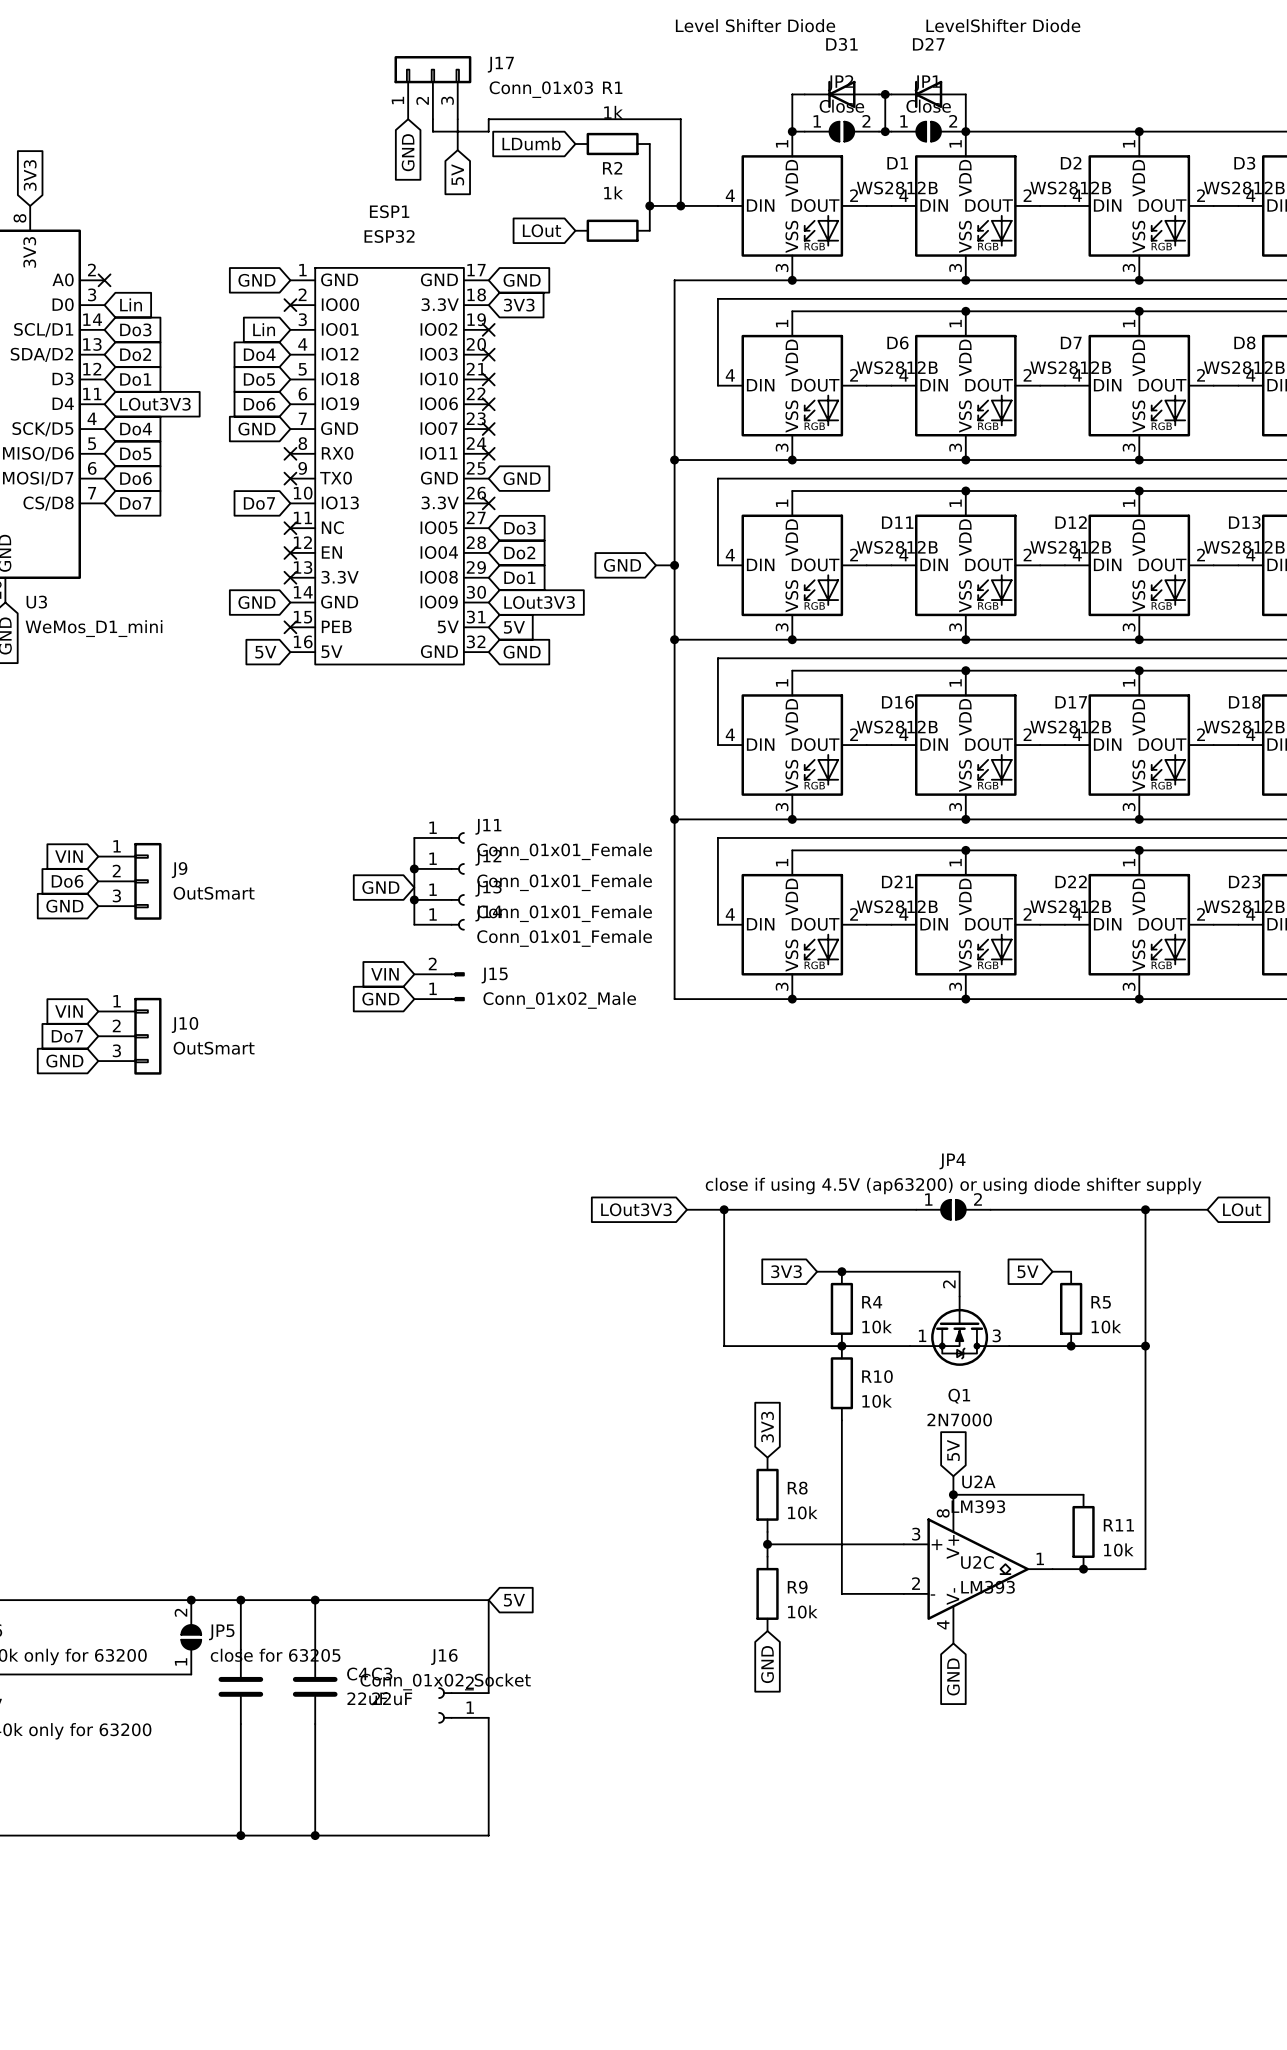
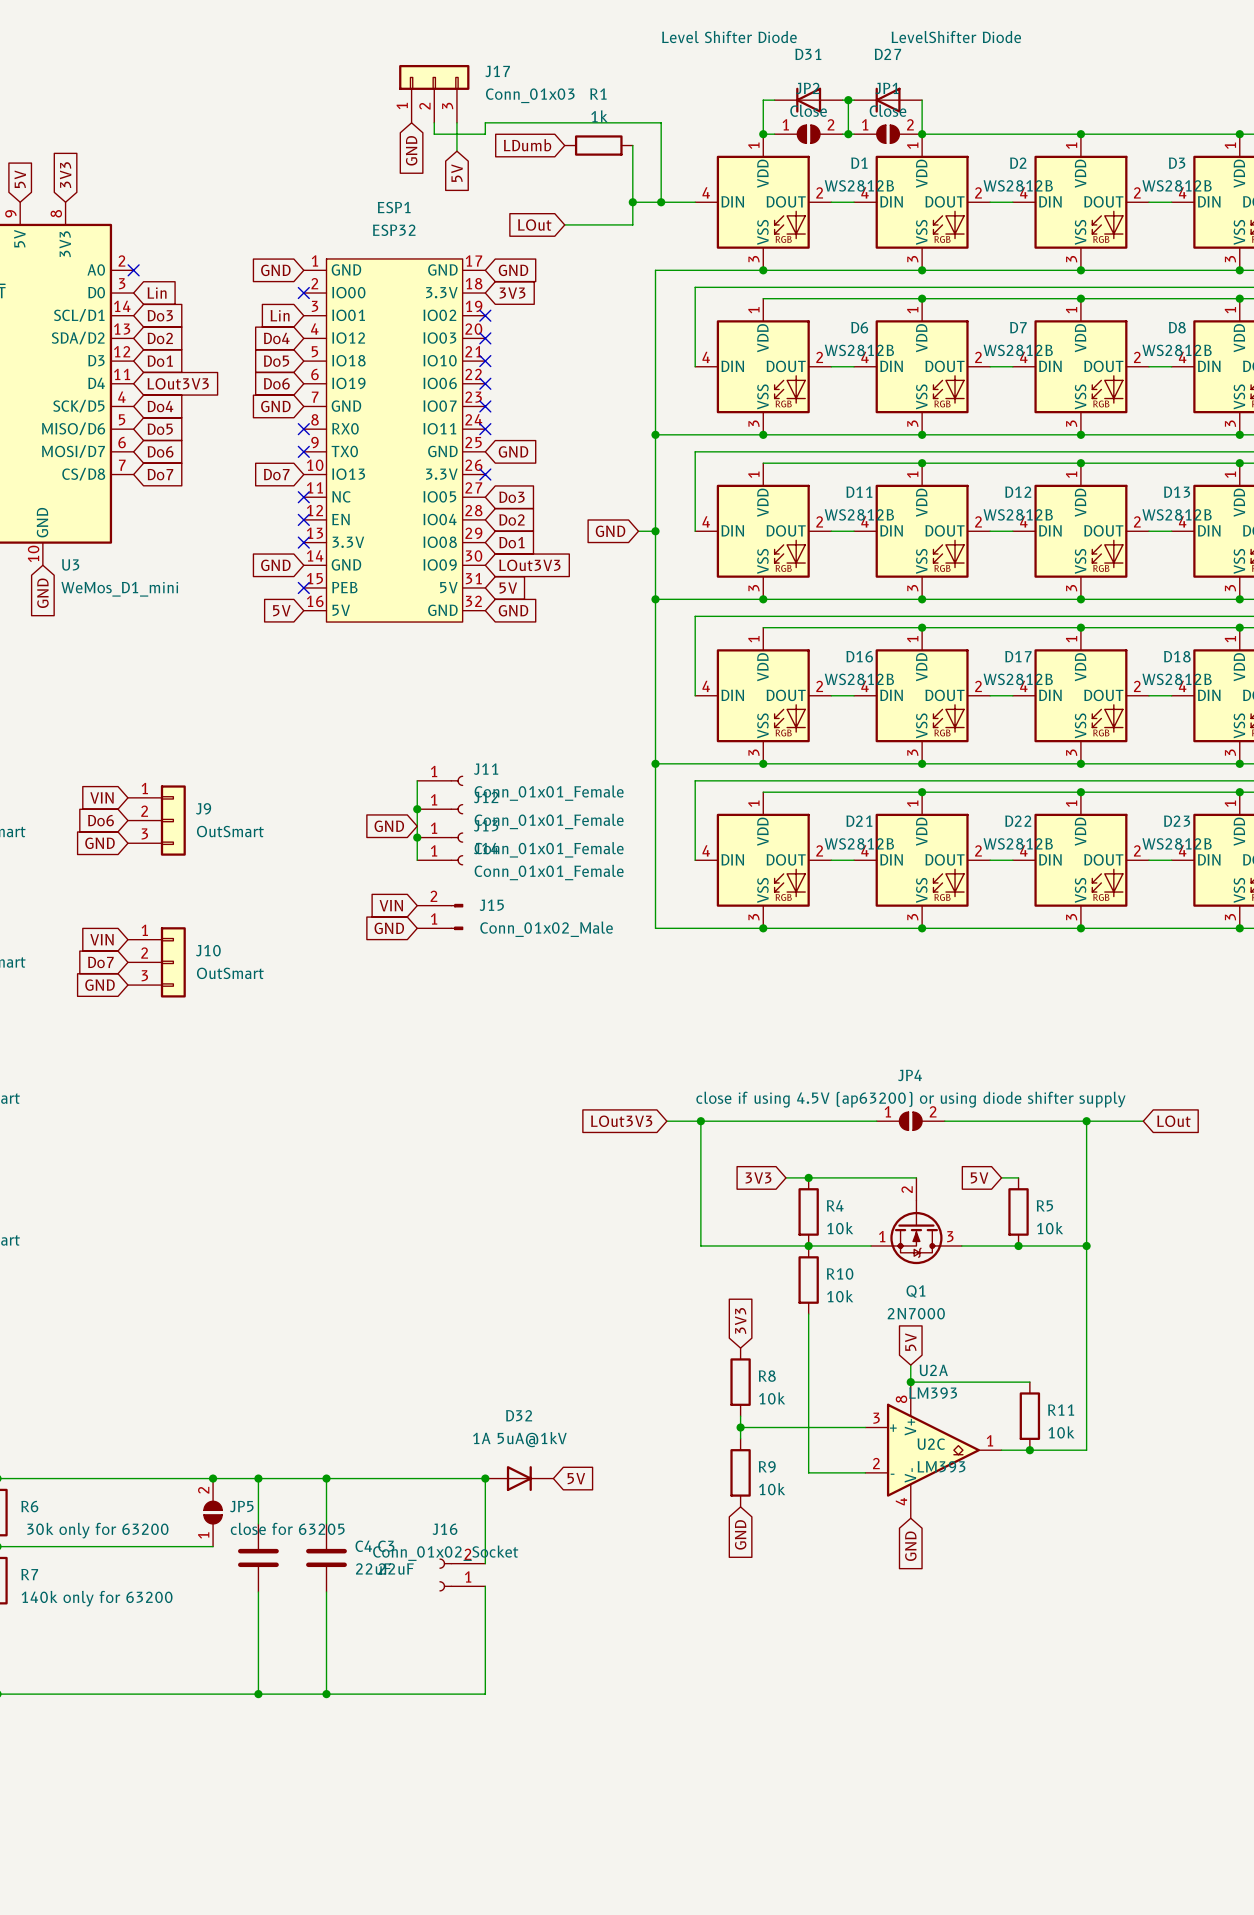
wire: none -> (564, 224) (632, 224)
R2: 1k (612, 230) -> none
junction: none -> (485, 1478)
global label position: 5V (514, 1600) -> 5V (576, 1478)
D32: none -> 1A 5uA@1kV (519, 1478)

